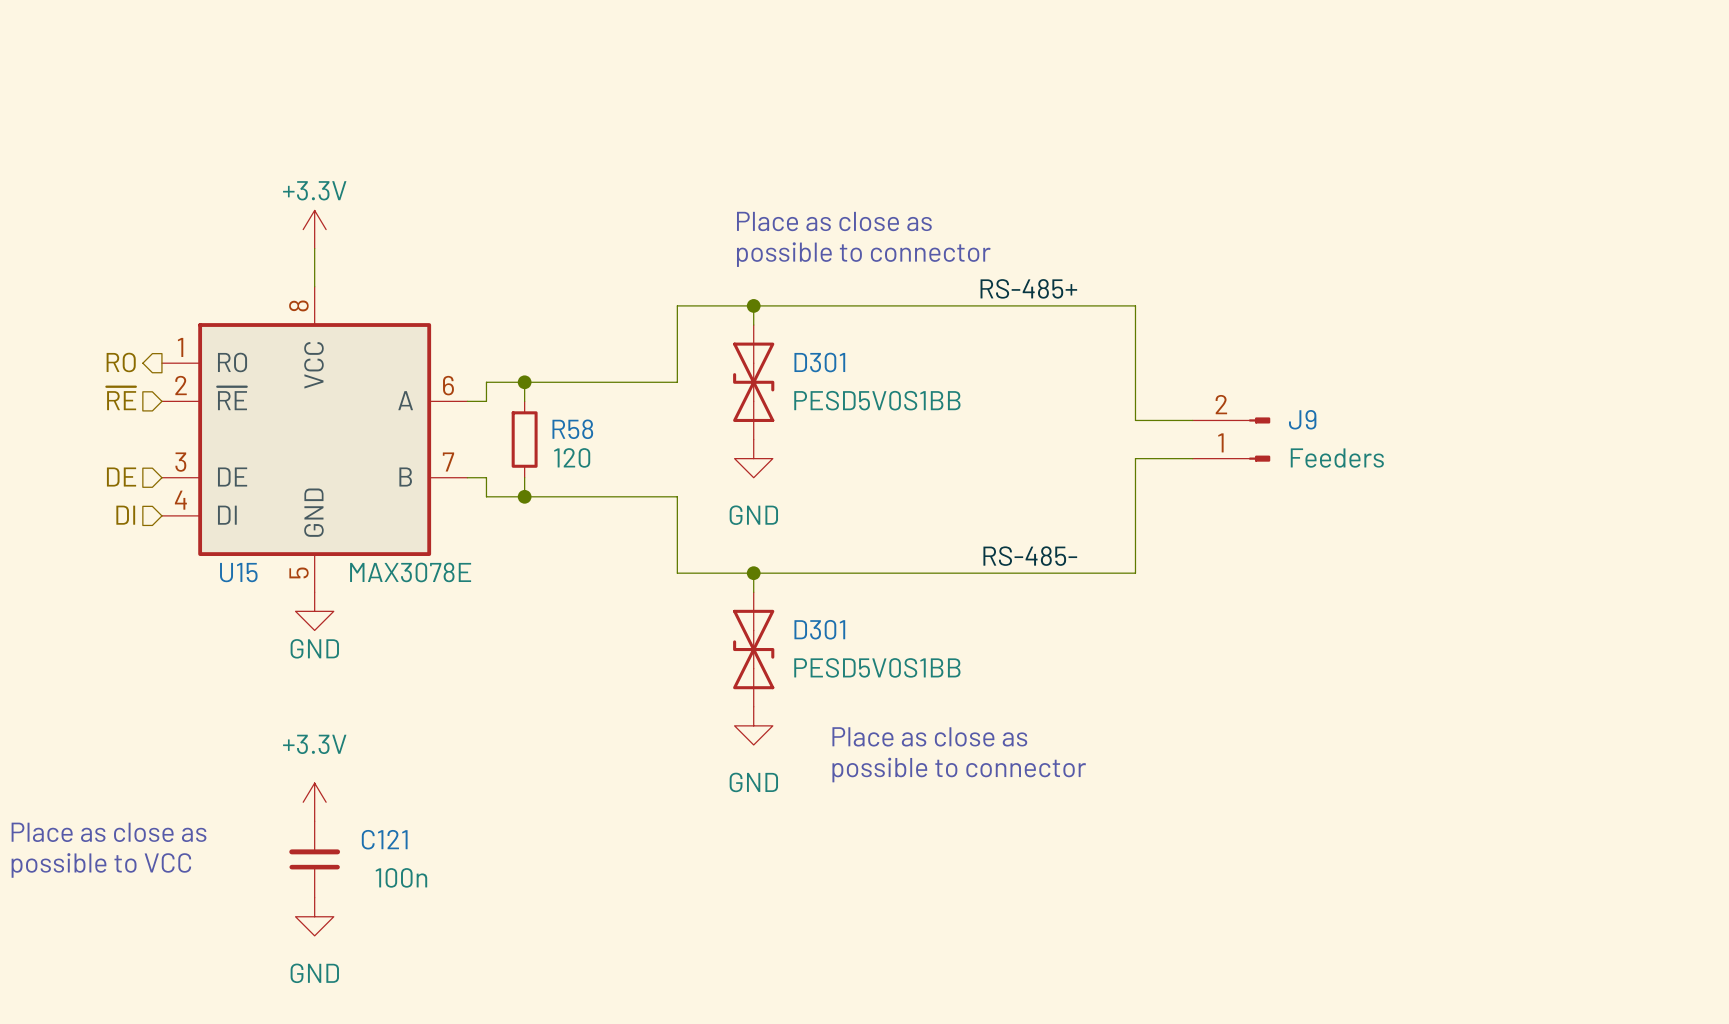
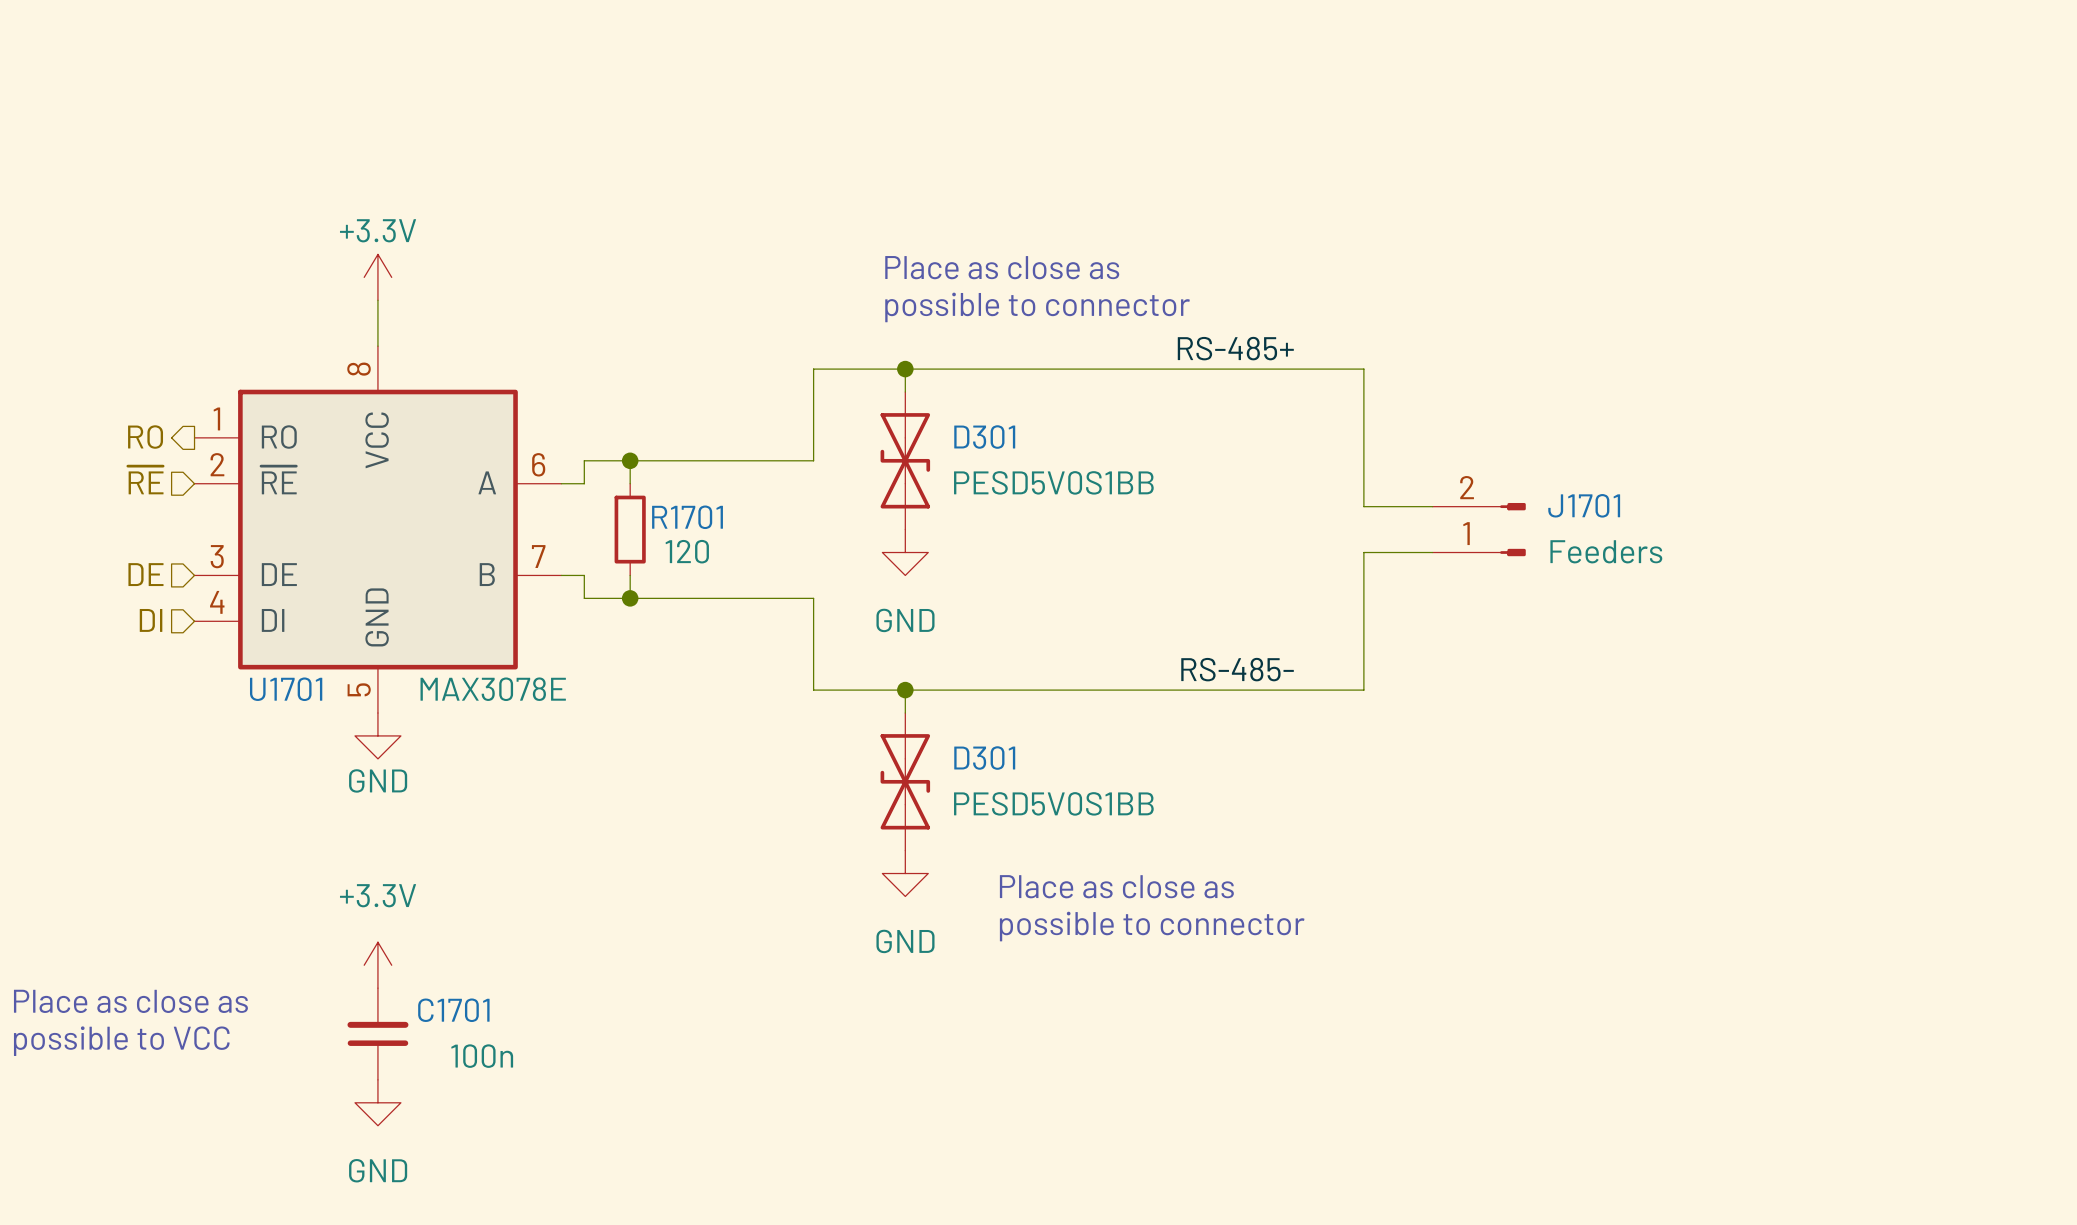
J9 name: J9 (1302, 419) -> J1701 (1584, 505)
R58 name: R58 (572, 429) -> R1701 (687, 517)
U15 name: U15 (238, 572) -> U1701 (286, 689)
C121 name: C121 (384, 839) -> C1701 (453, 1010)

